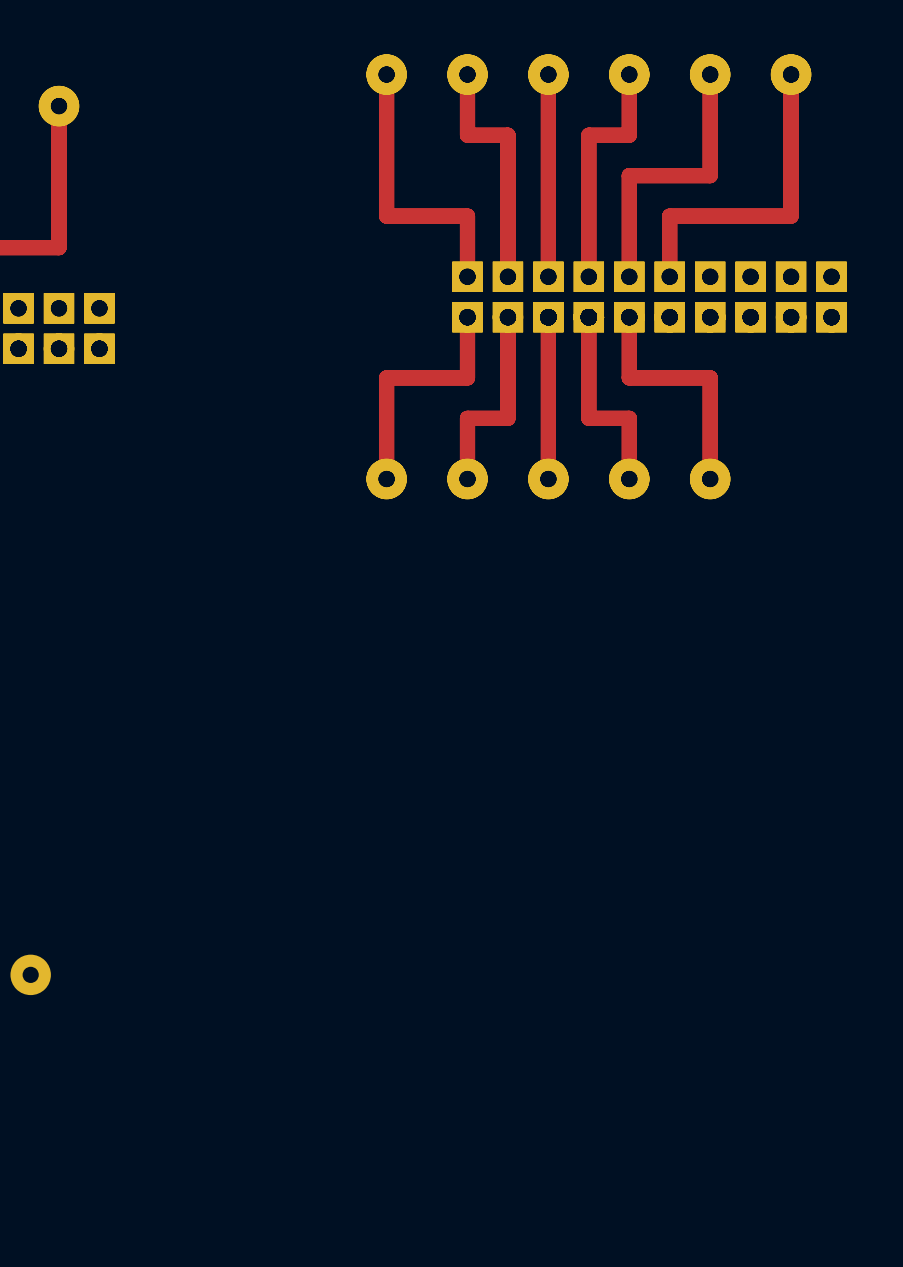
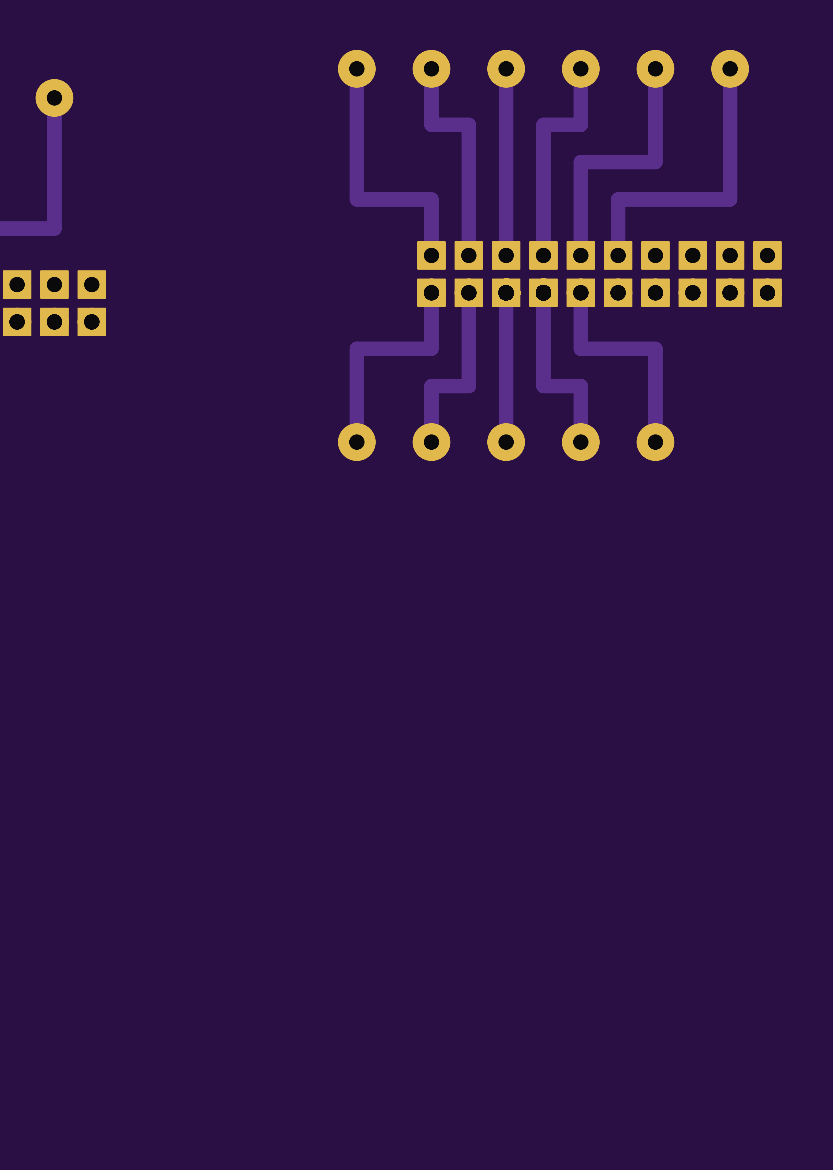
part: (30, 974) -> none

